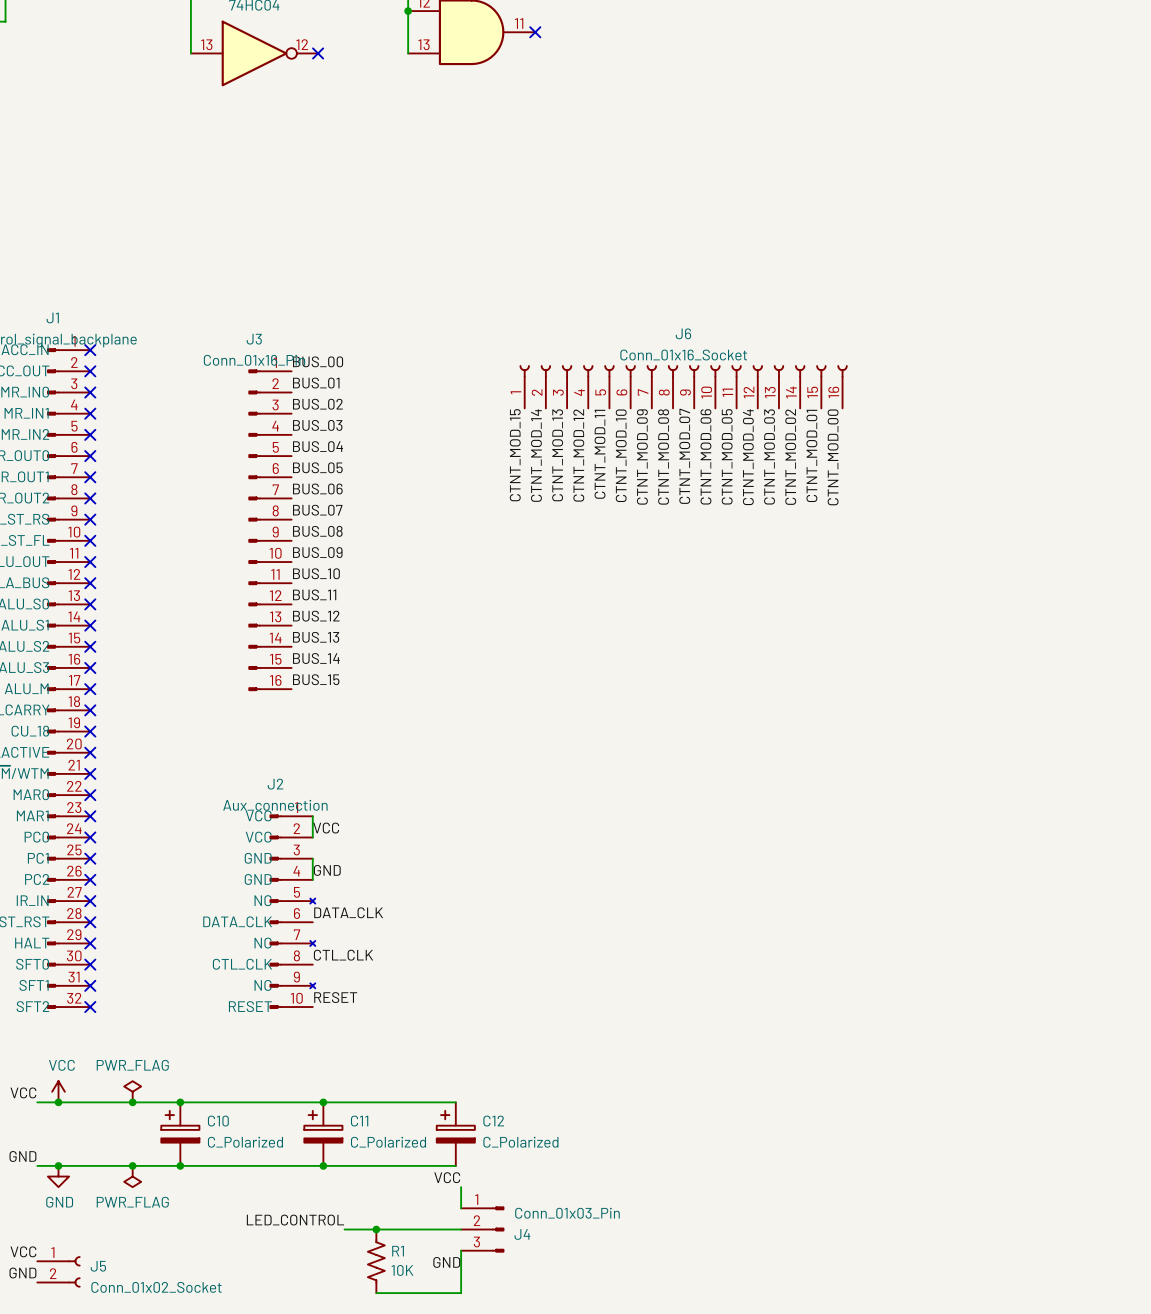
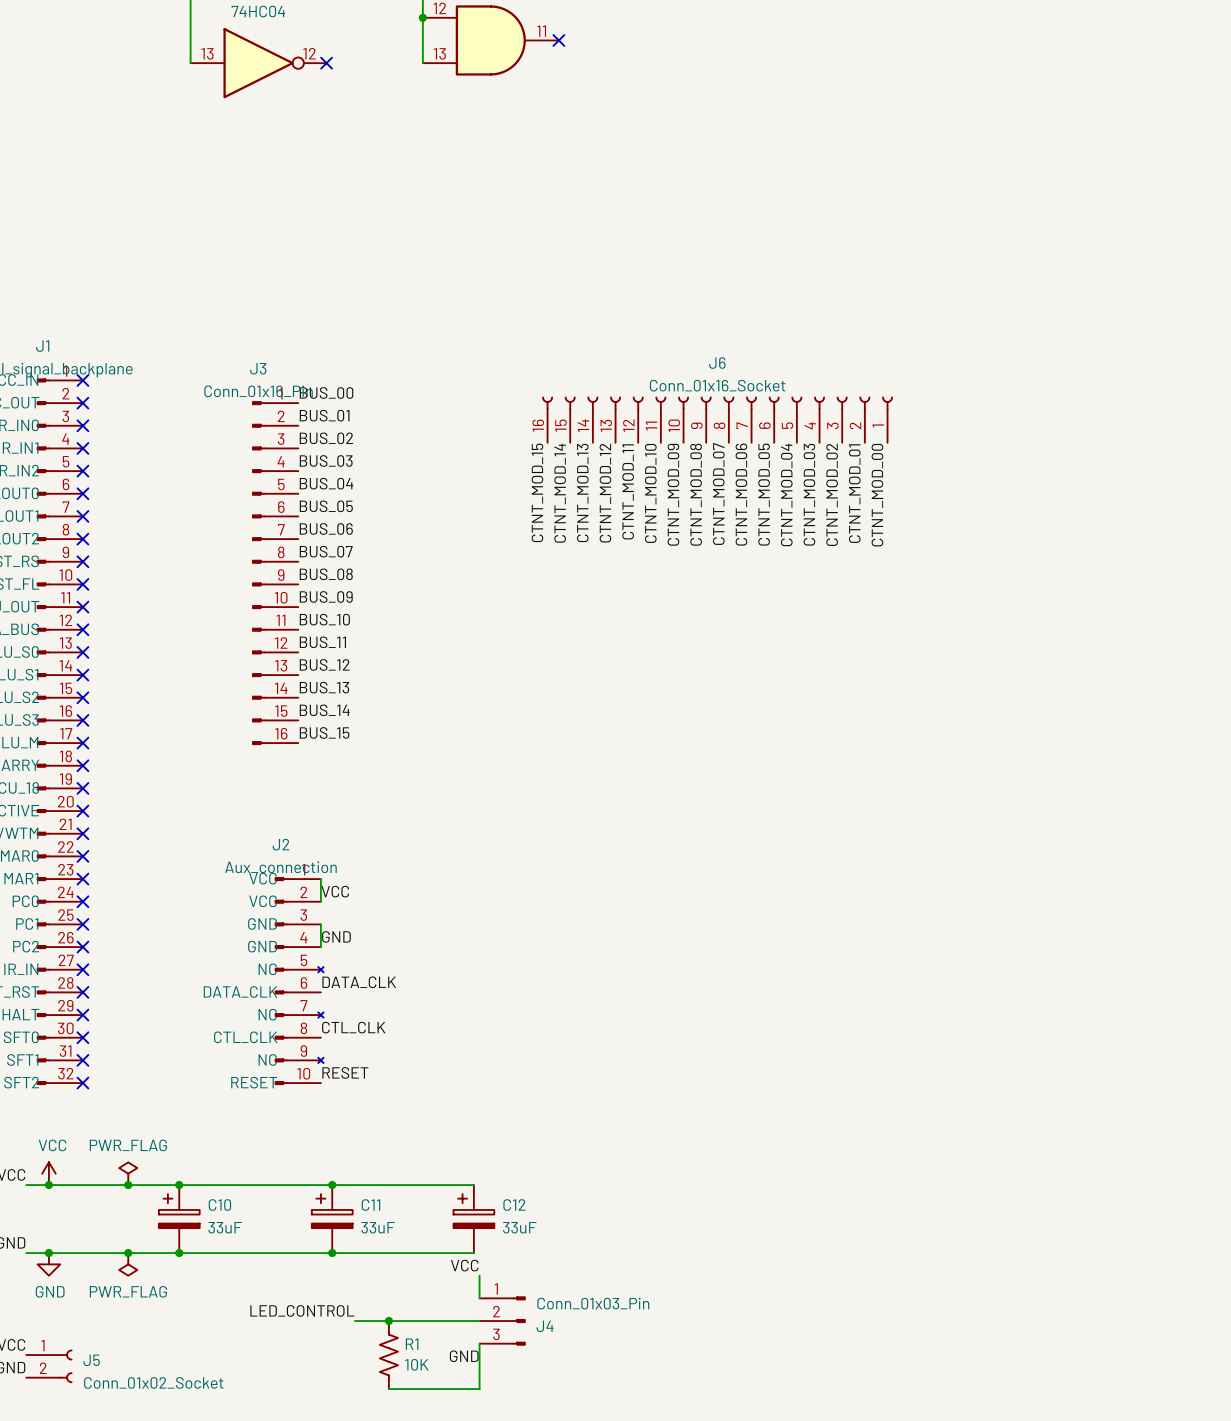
J6 flip: as is (683, 371) -> left-right (717, 403)
C10 value: C_Polarized (245, 1142) -> 33uF (225, 1227)
C11 value: C_Polarized (388, 1142) -> 33uF (378, 1227)
C12 value: C_Polarized (520, 1142) -> 33uF (519, 1227)

